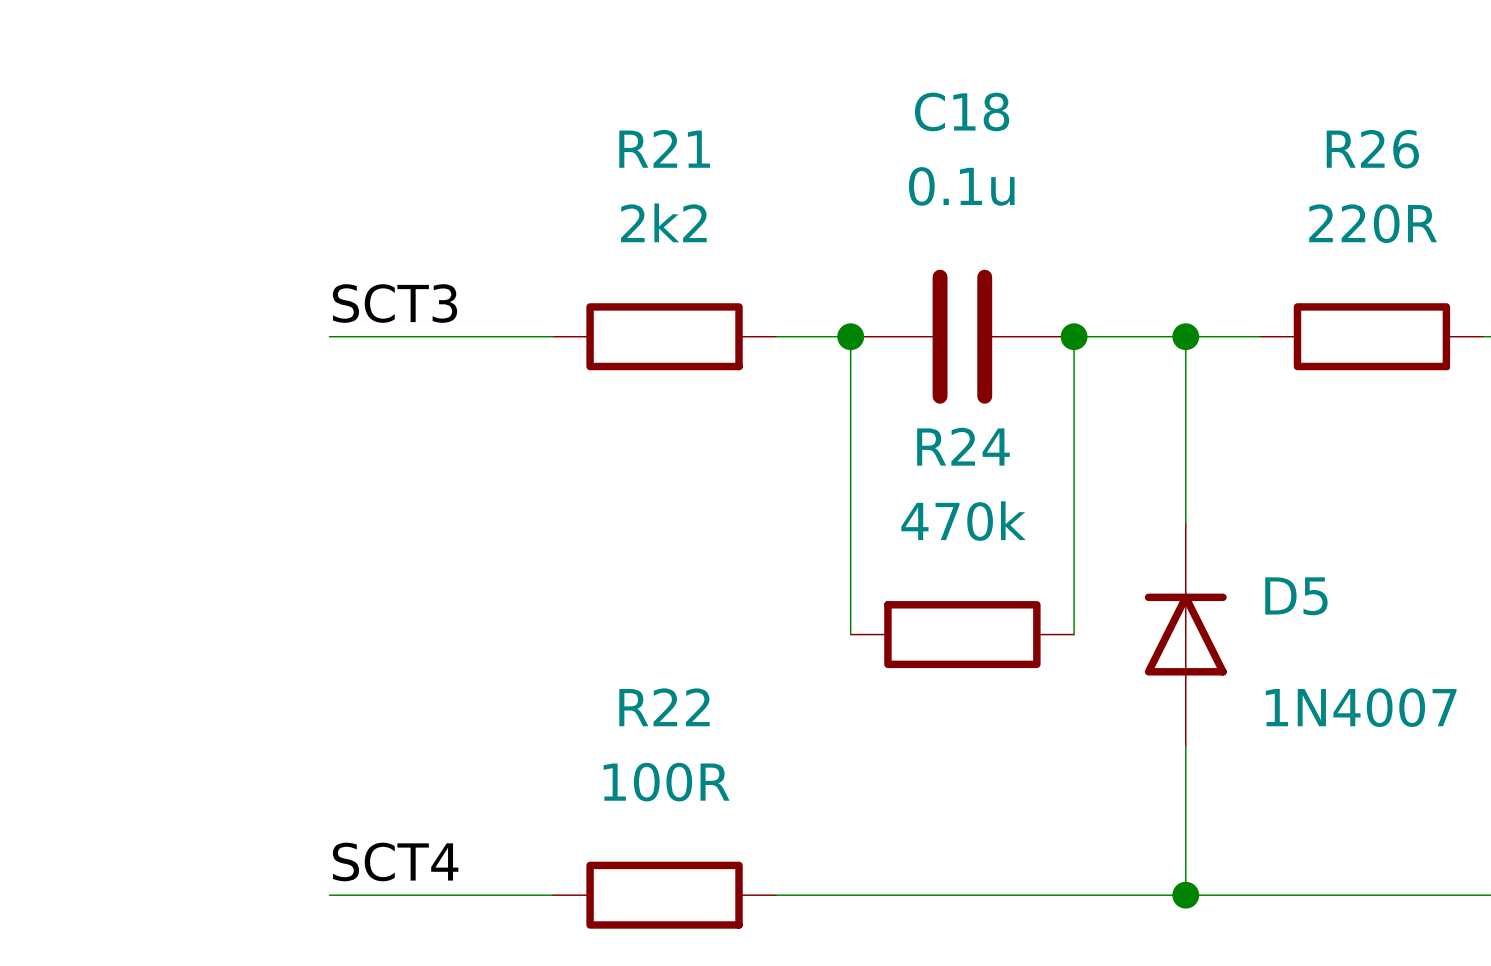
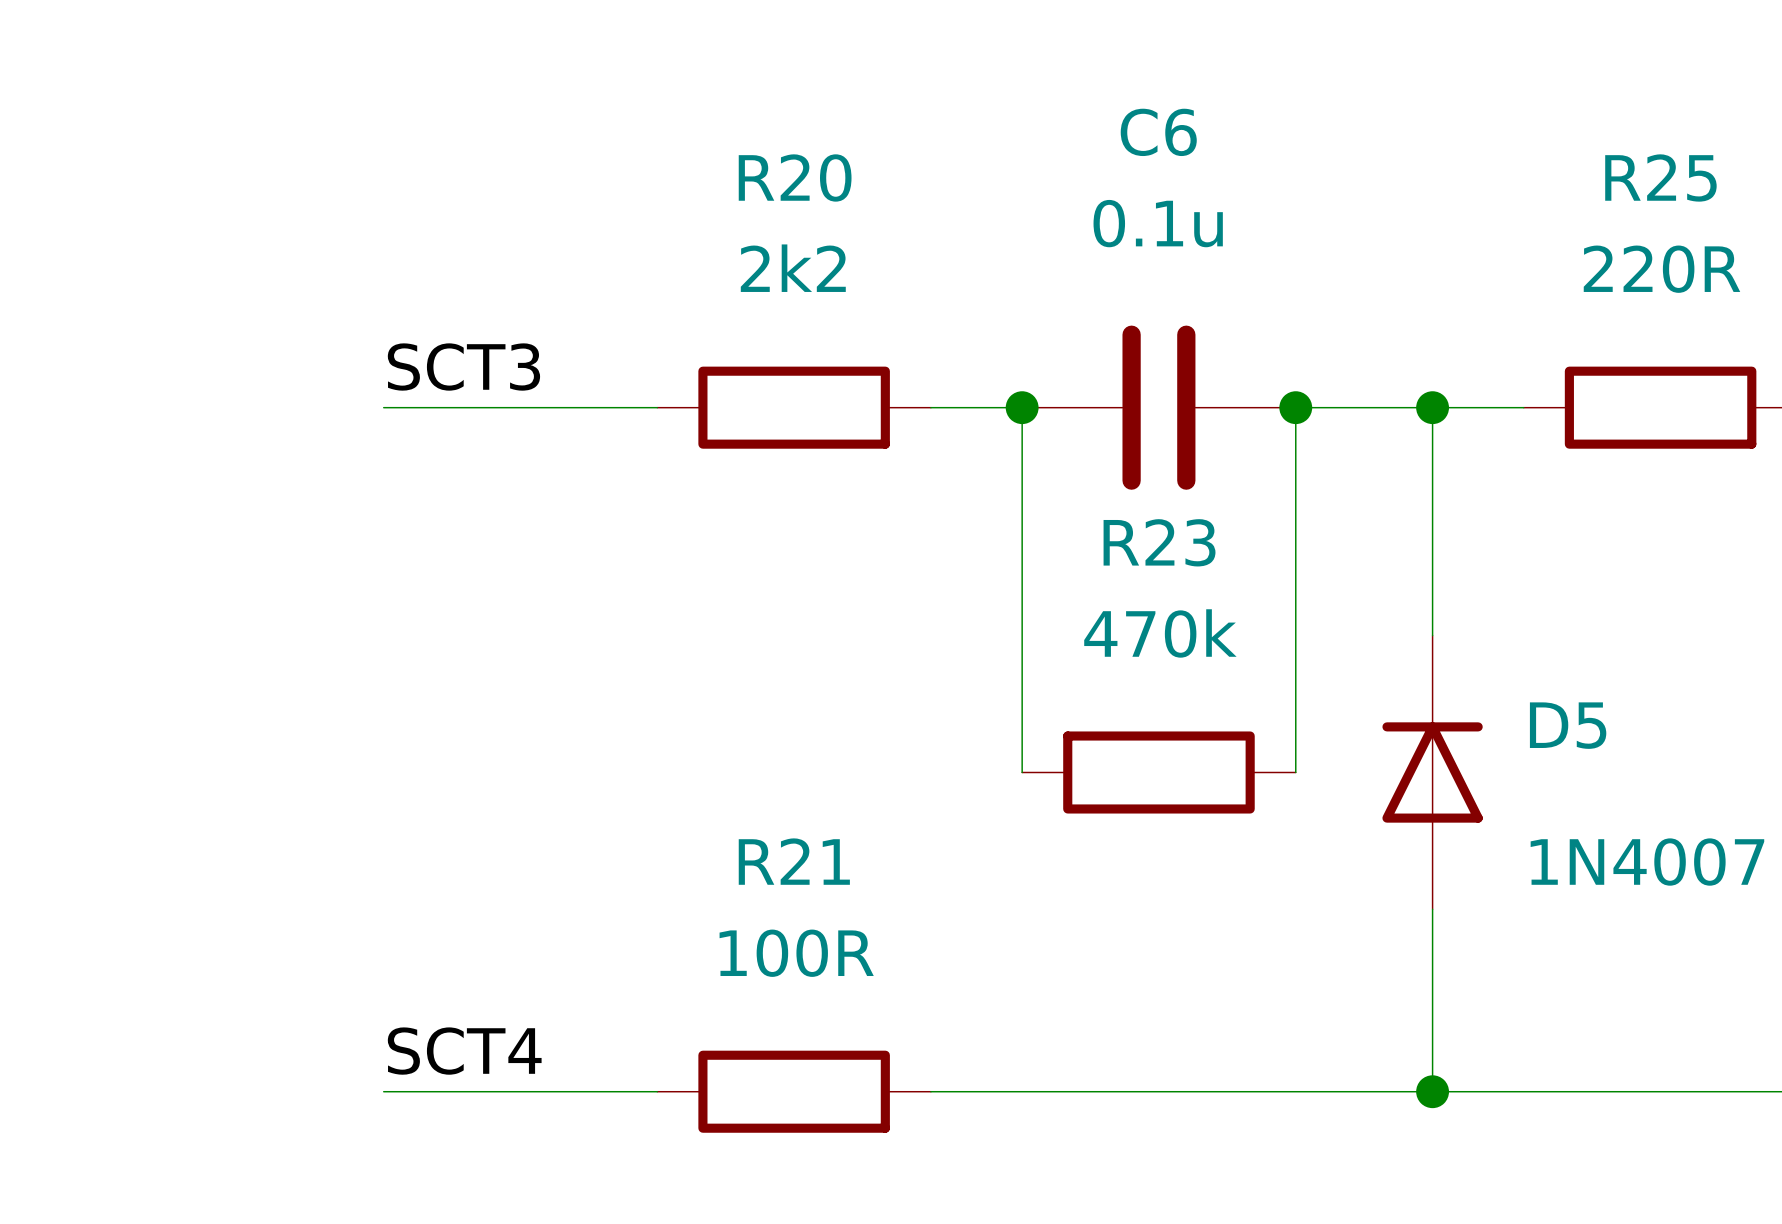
C18 name: C18 (962, 111) -> C6 (1158, 132)
R21 name: R21 (664, 148) -> R20 (795, 177)
R26 name: R26 (1372, 149) -> R25 (1660, 177)
R24 name: R24 (963, 446) -> R23 (1159, 542)
R22 name: R22 (664, 707) -> R21 (794, 861)

